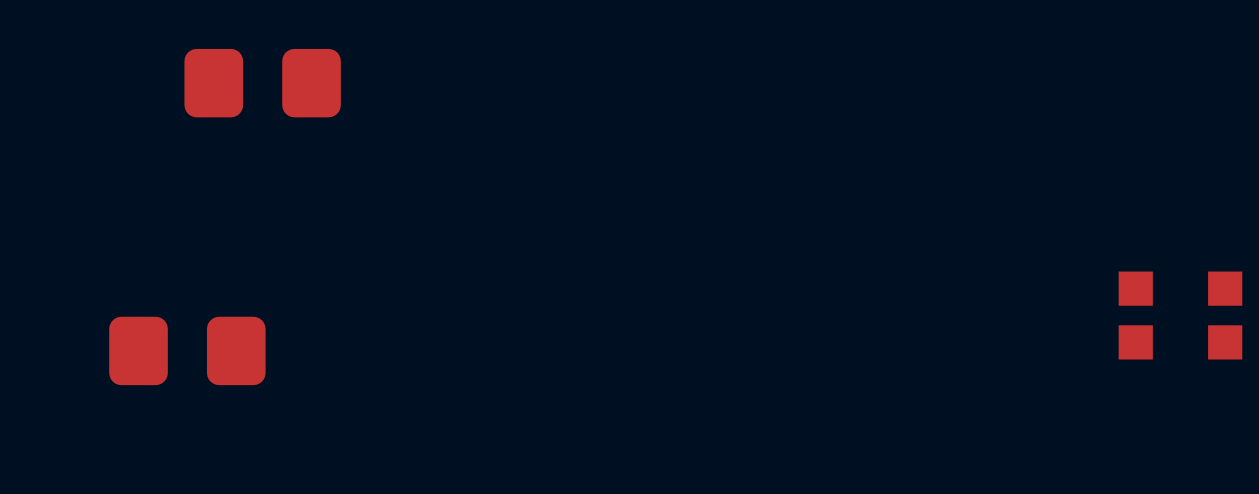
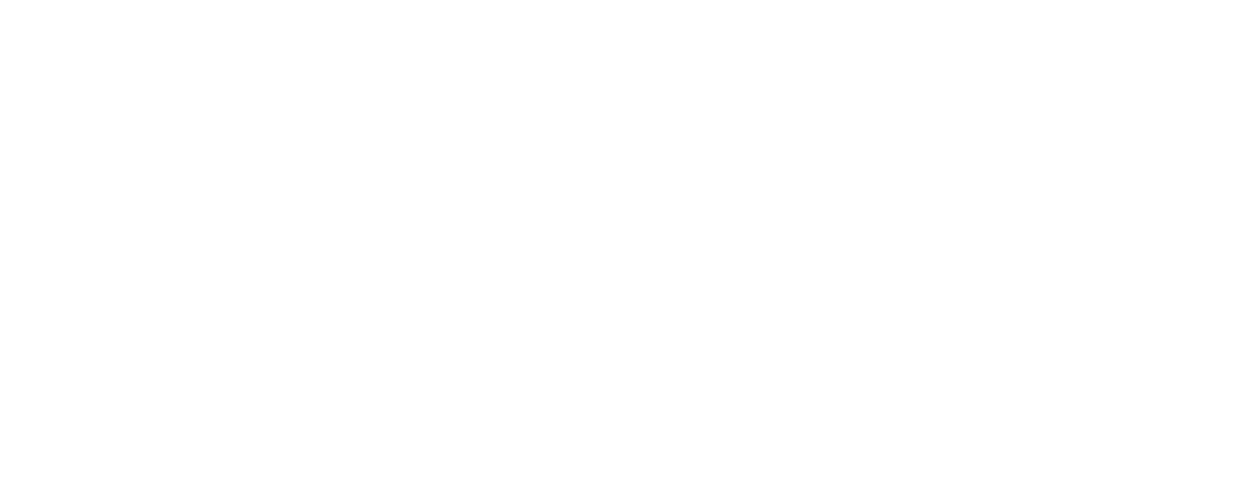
part: (262, 83) -> none
part: (1180, 315) -> none
part: (187, 350) -> none

